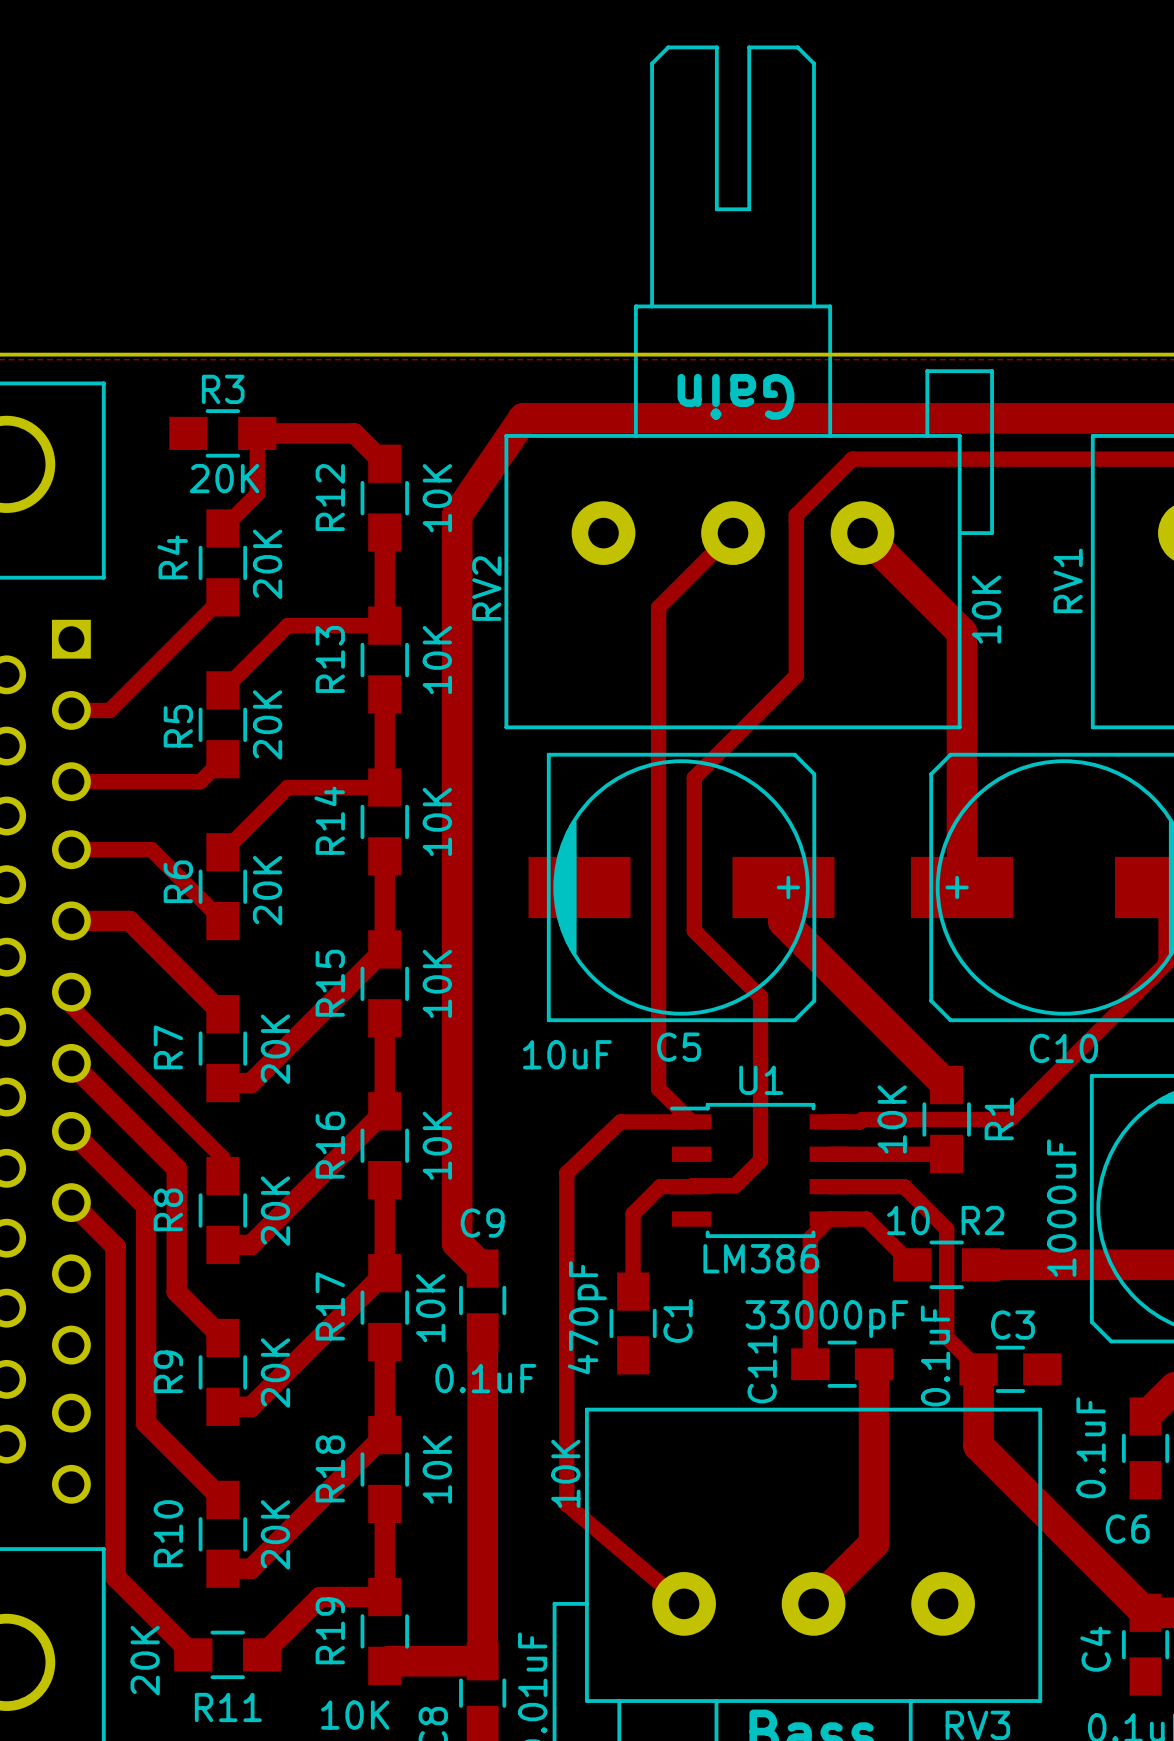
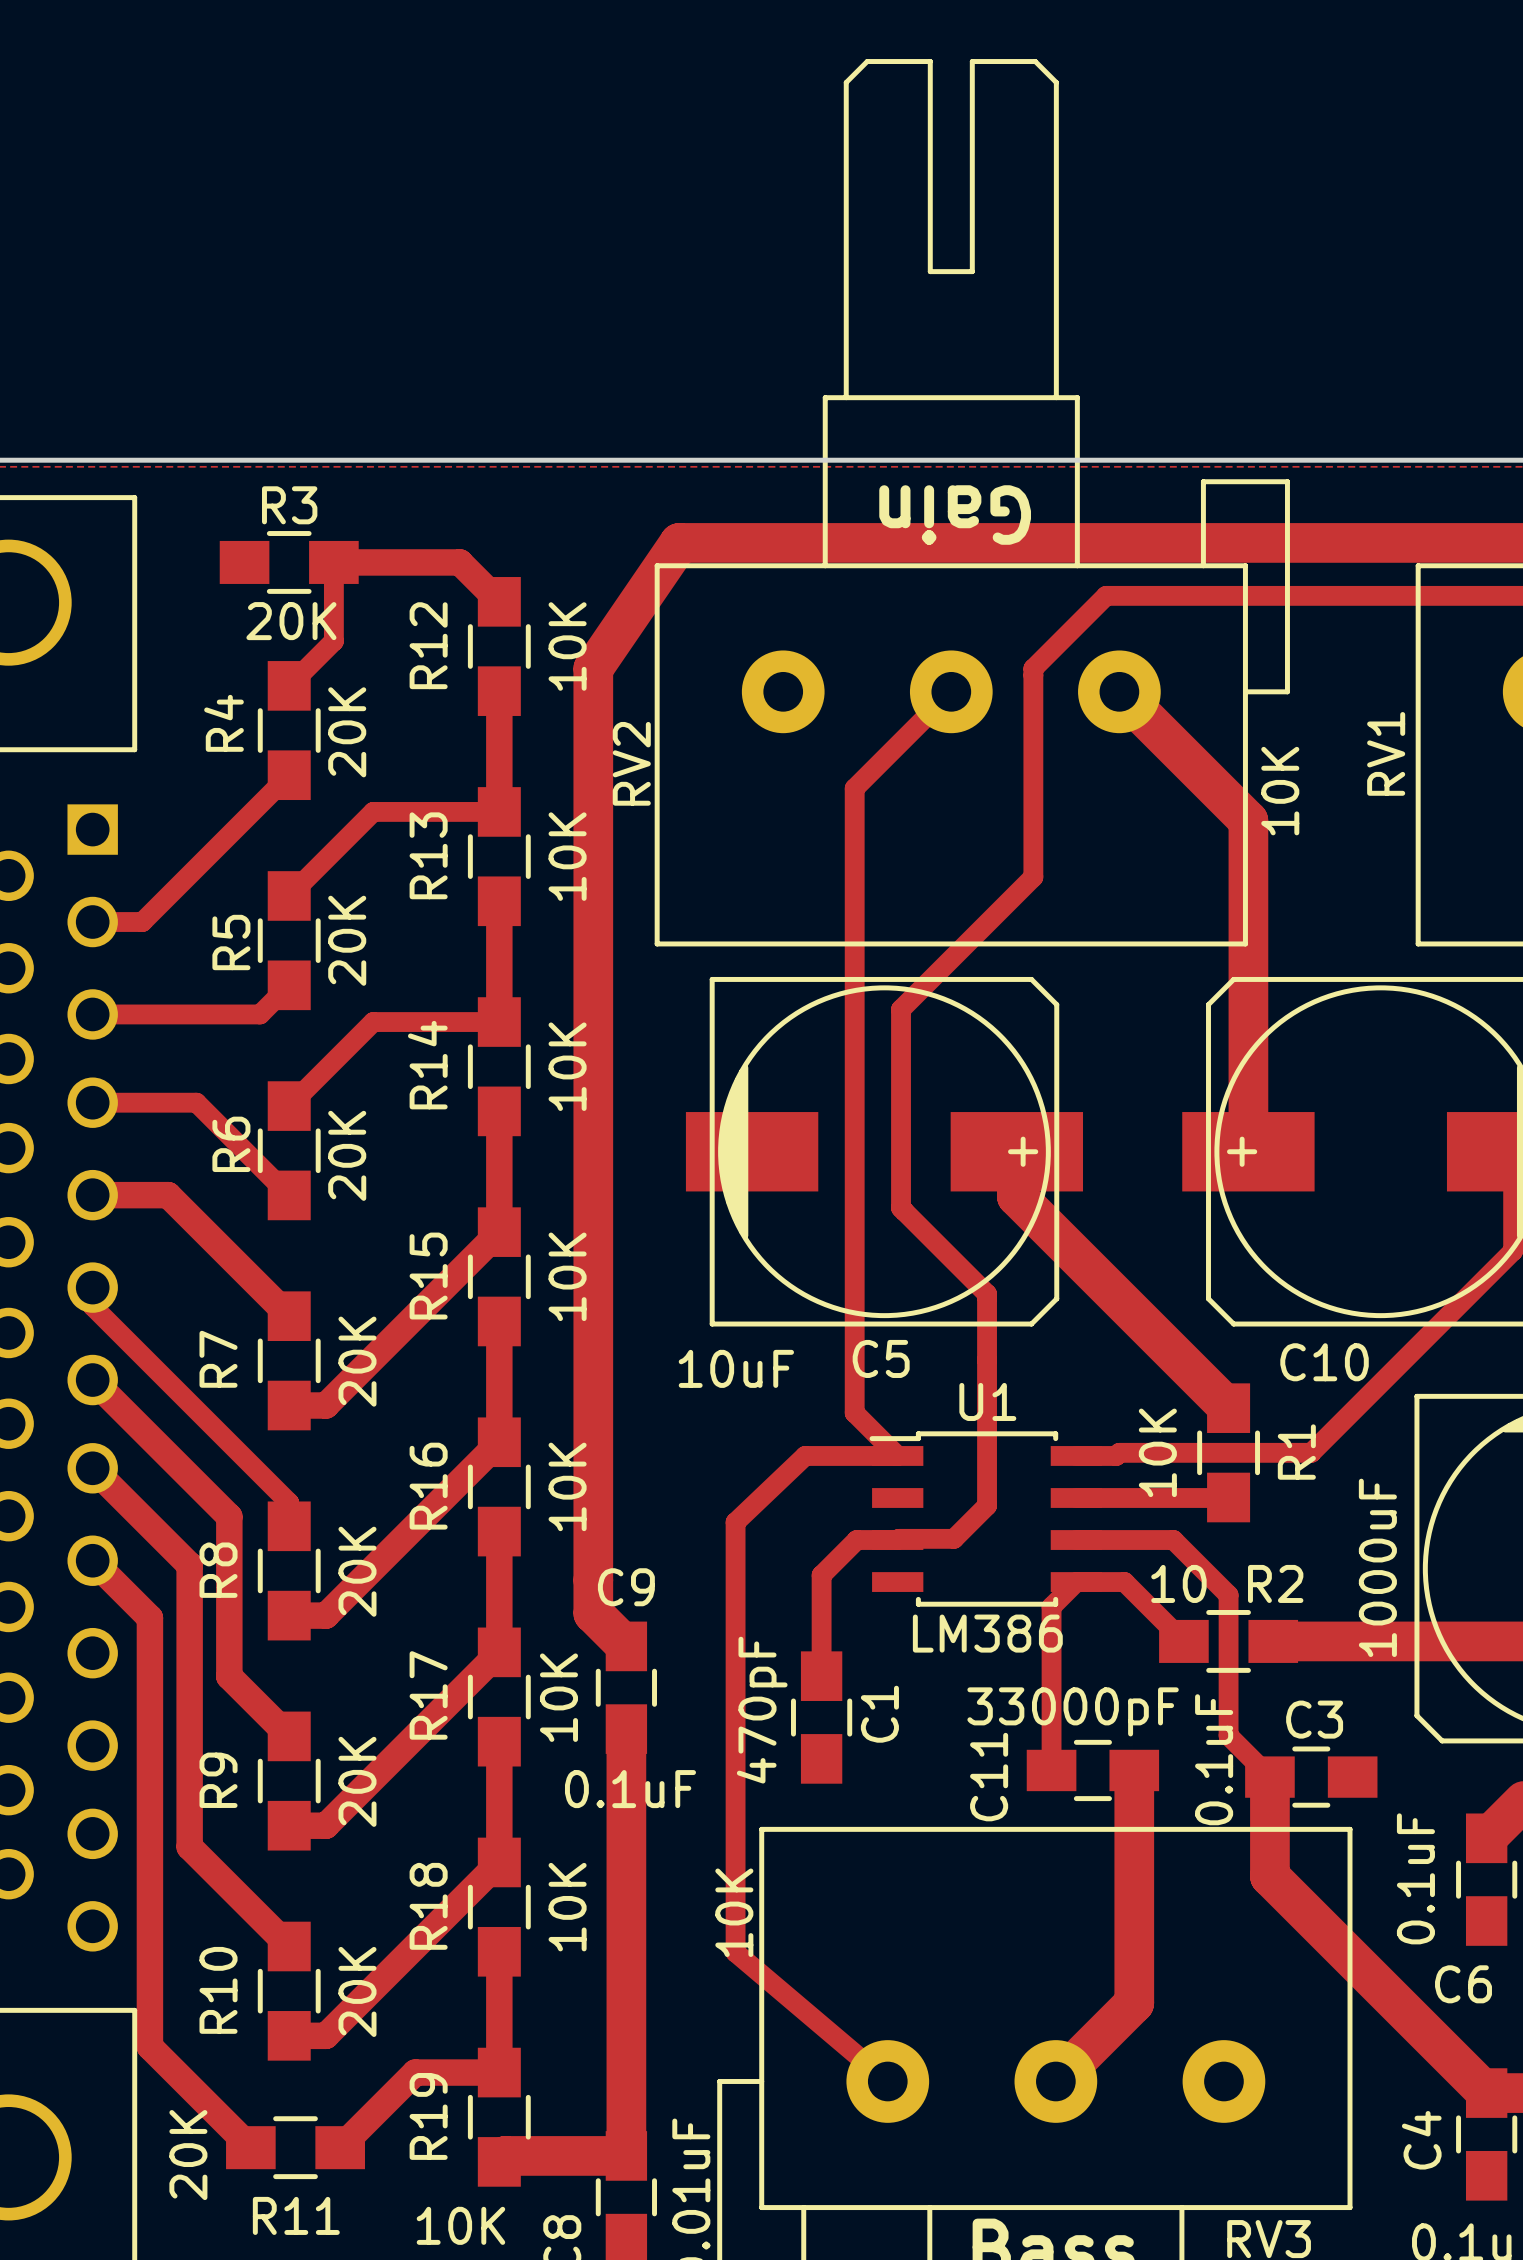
C10 name position: C10 (1063, 1048) -> C10 (1324, 1362)

